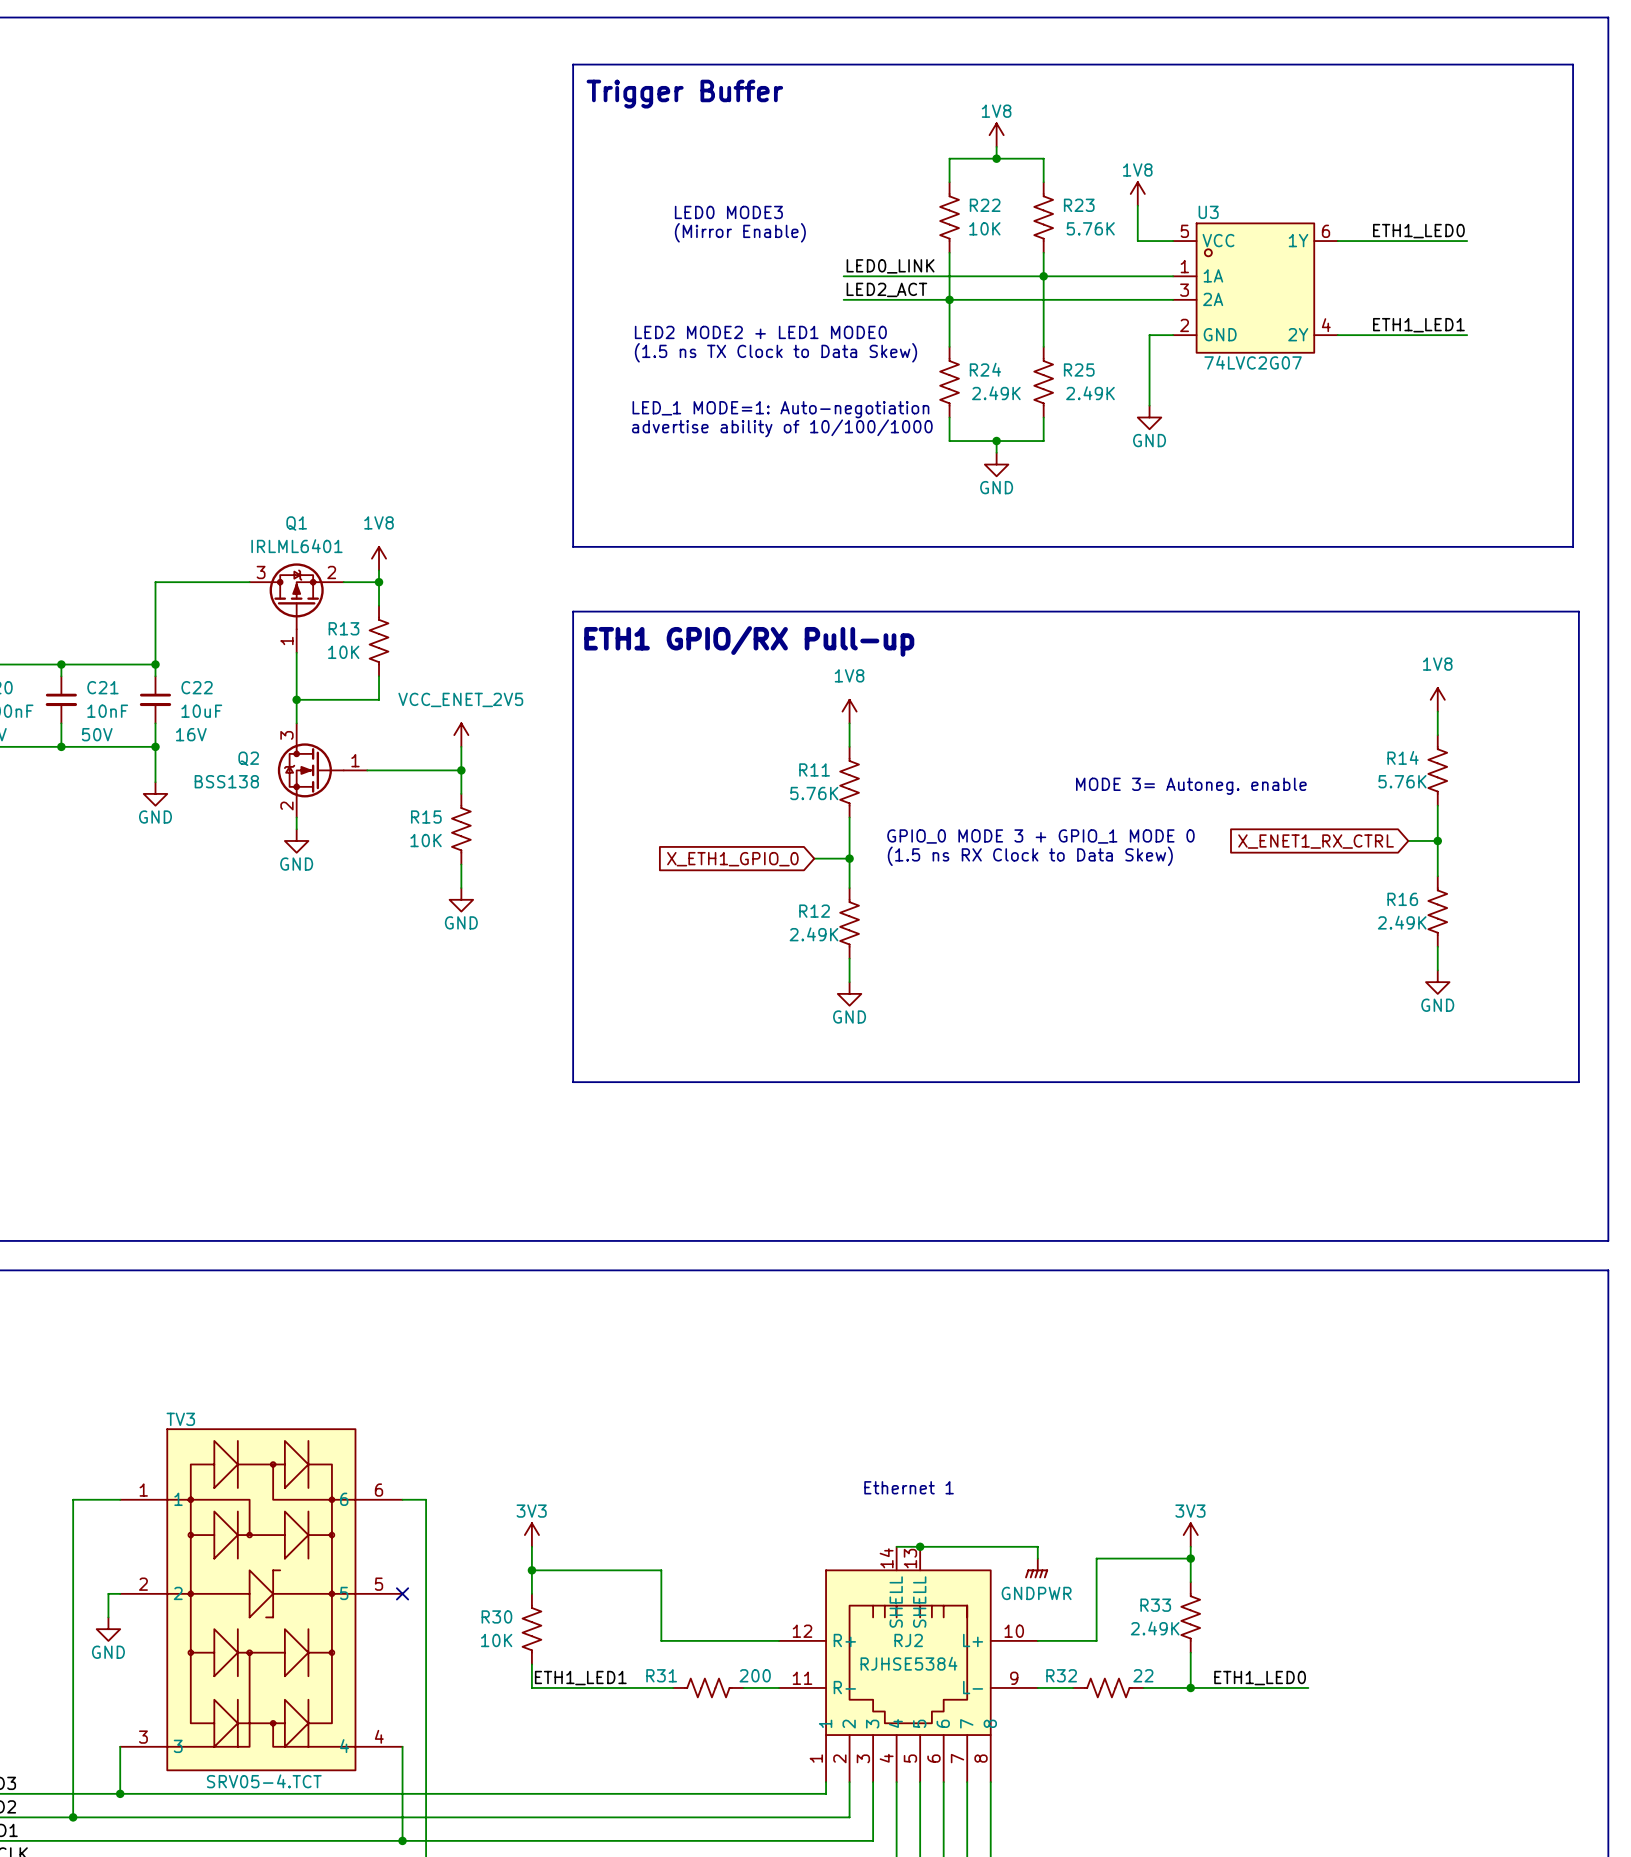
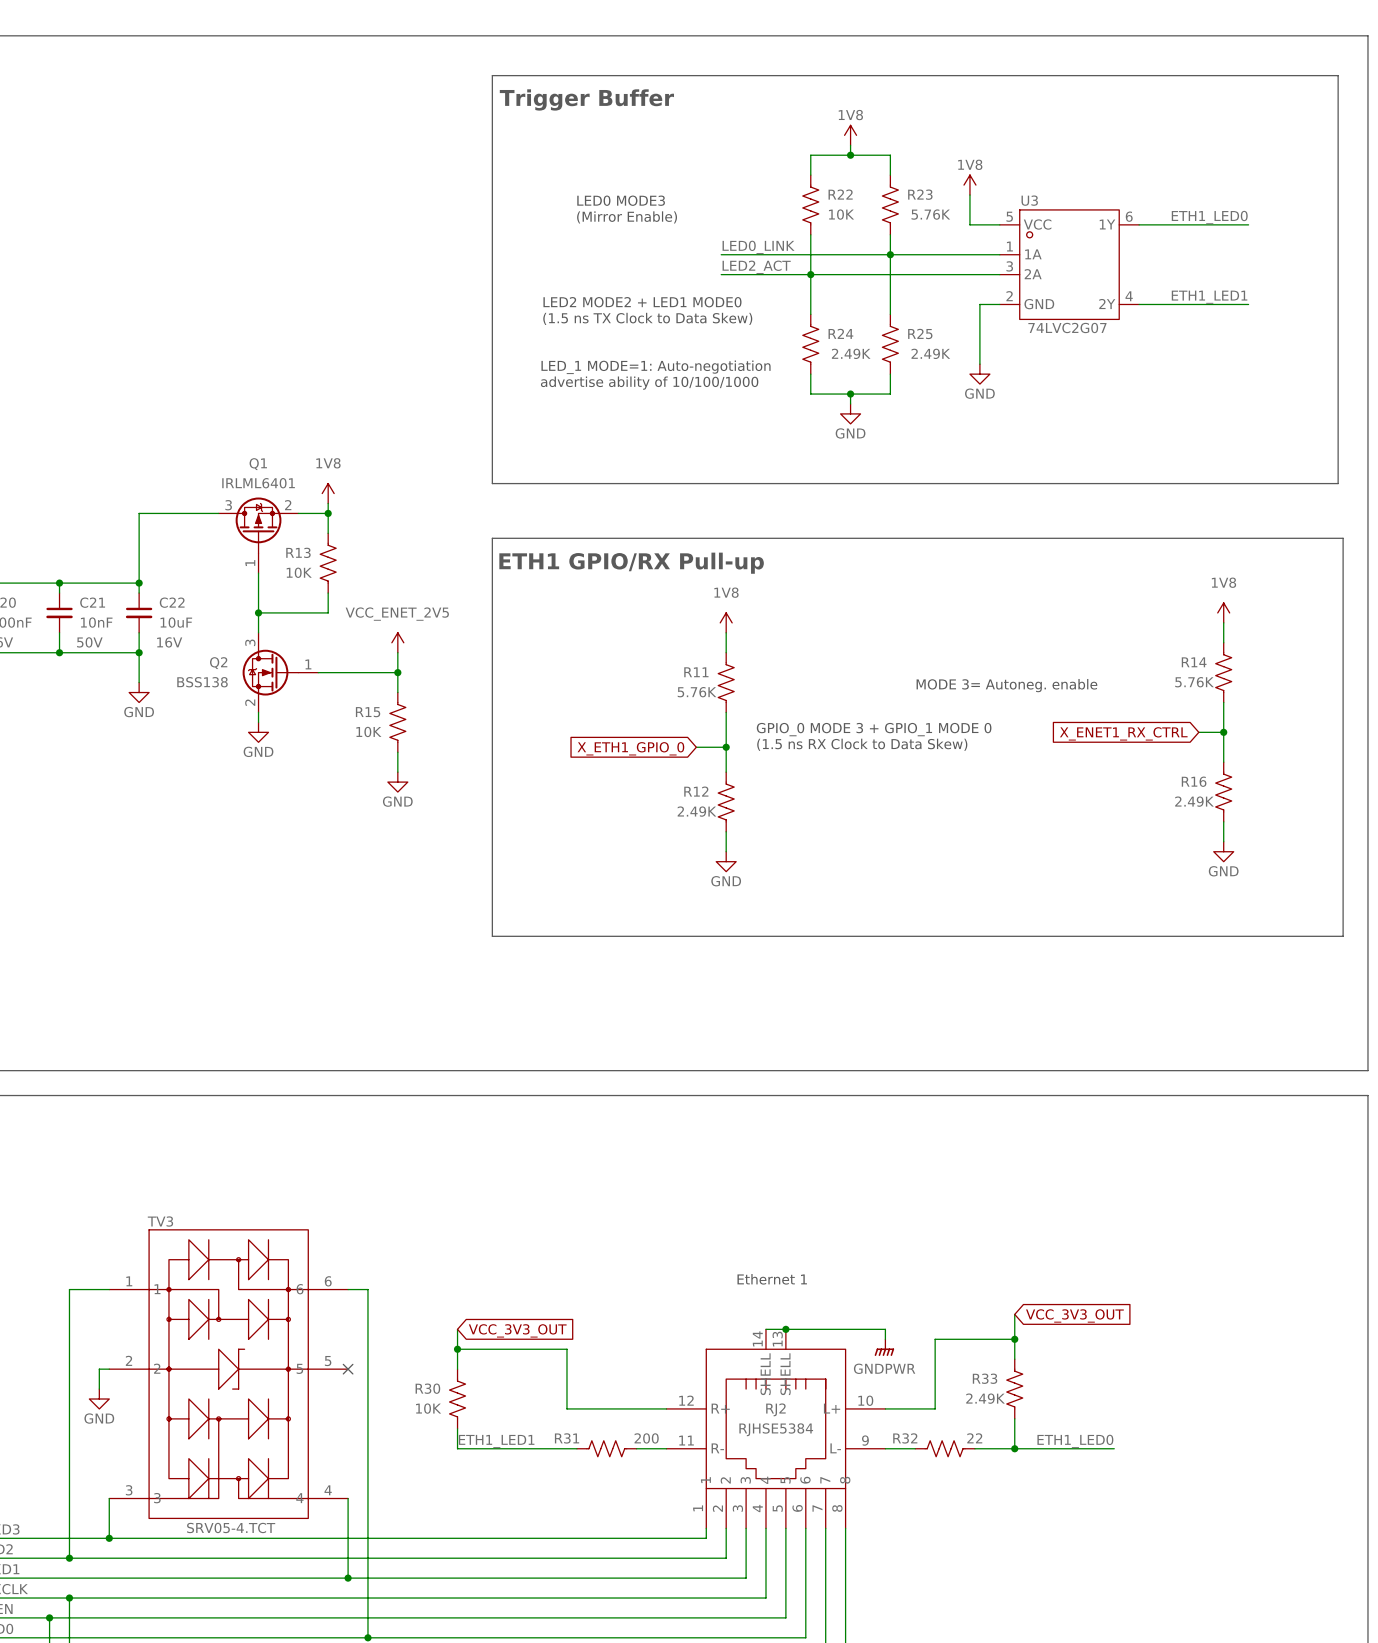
global label: none -> VCC_3V3_OUT (1074, 1315)
power symbol: 3V3 (531, 1535) -> none
power symbol: 3V3 (1190, 1535) -> none
global label: none -> VCC_3V3_OUT (517, 1330)

